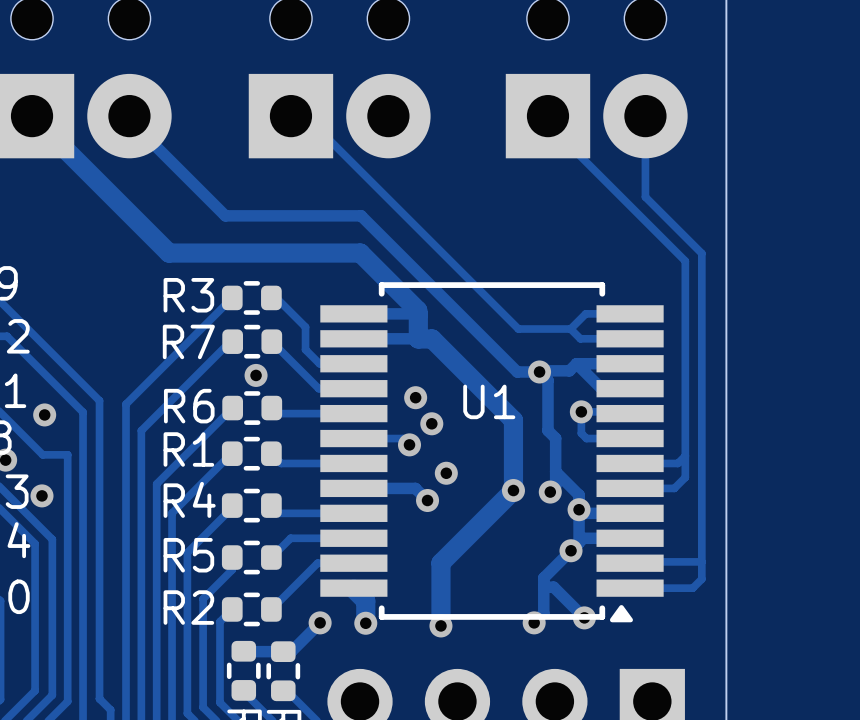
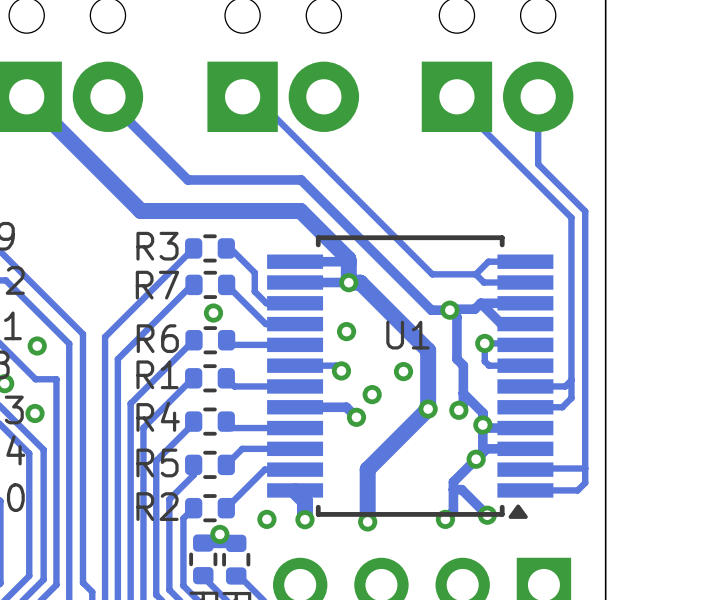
via: none -> (348, 282)
via: (431, 423) -> none
via: none -> (403, 371)
track: (320, 622) (291, 651) (283, 651) -> none
via: none -> (219, 534)

